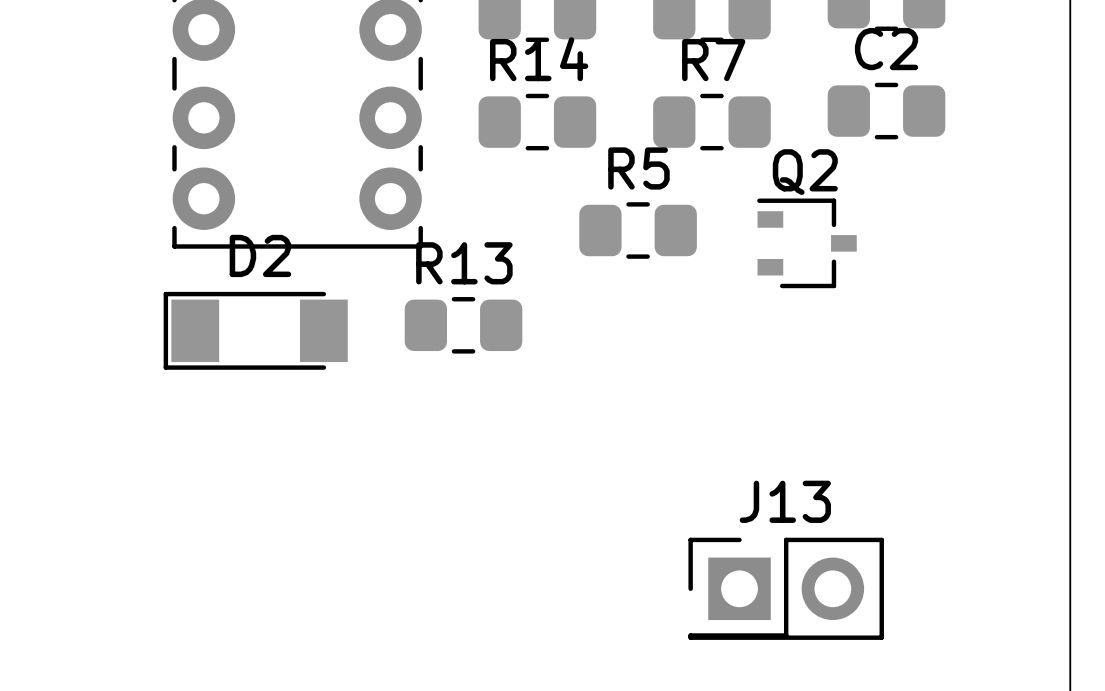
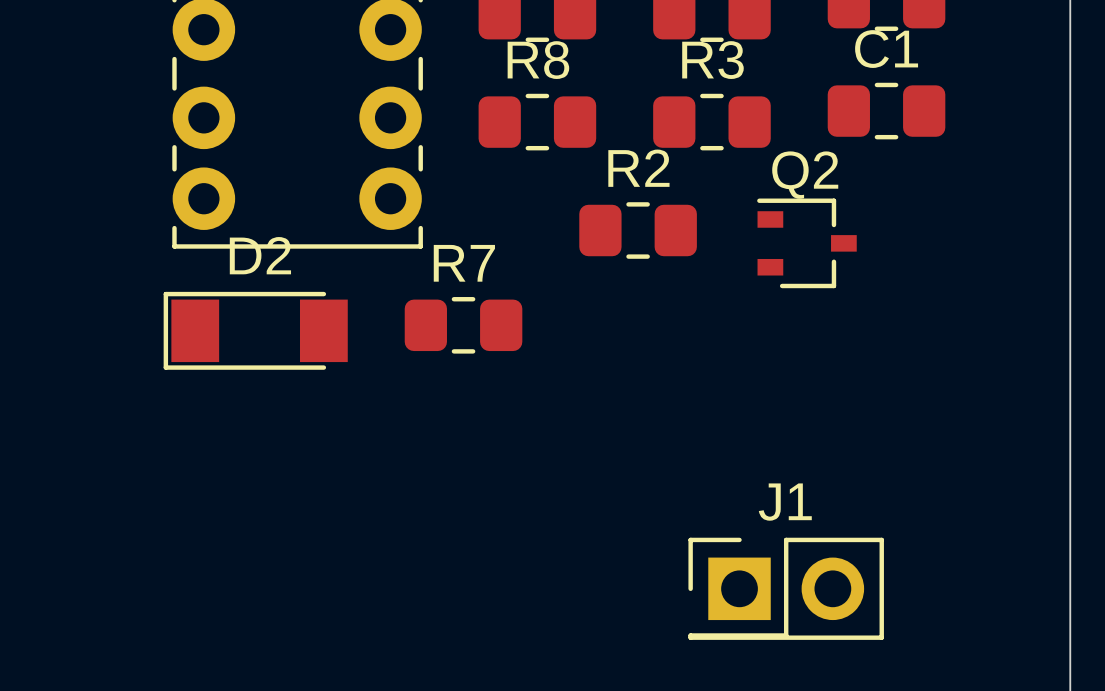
C2 name: C2 (886, 49) -> C1 (886, 49)
R14 name: R14 (539, 59) -> R8 (538, 60)
R7 name: R7 (713, 60) -> R3 (712, 60)
R5 name: R5 (638, 168) -> R2 (638, 168)
R13 name: R13 (464, 263) -> R7 (464, 263)
J13 name: J13 (785, 501) -> J1 (785, 502)

